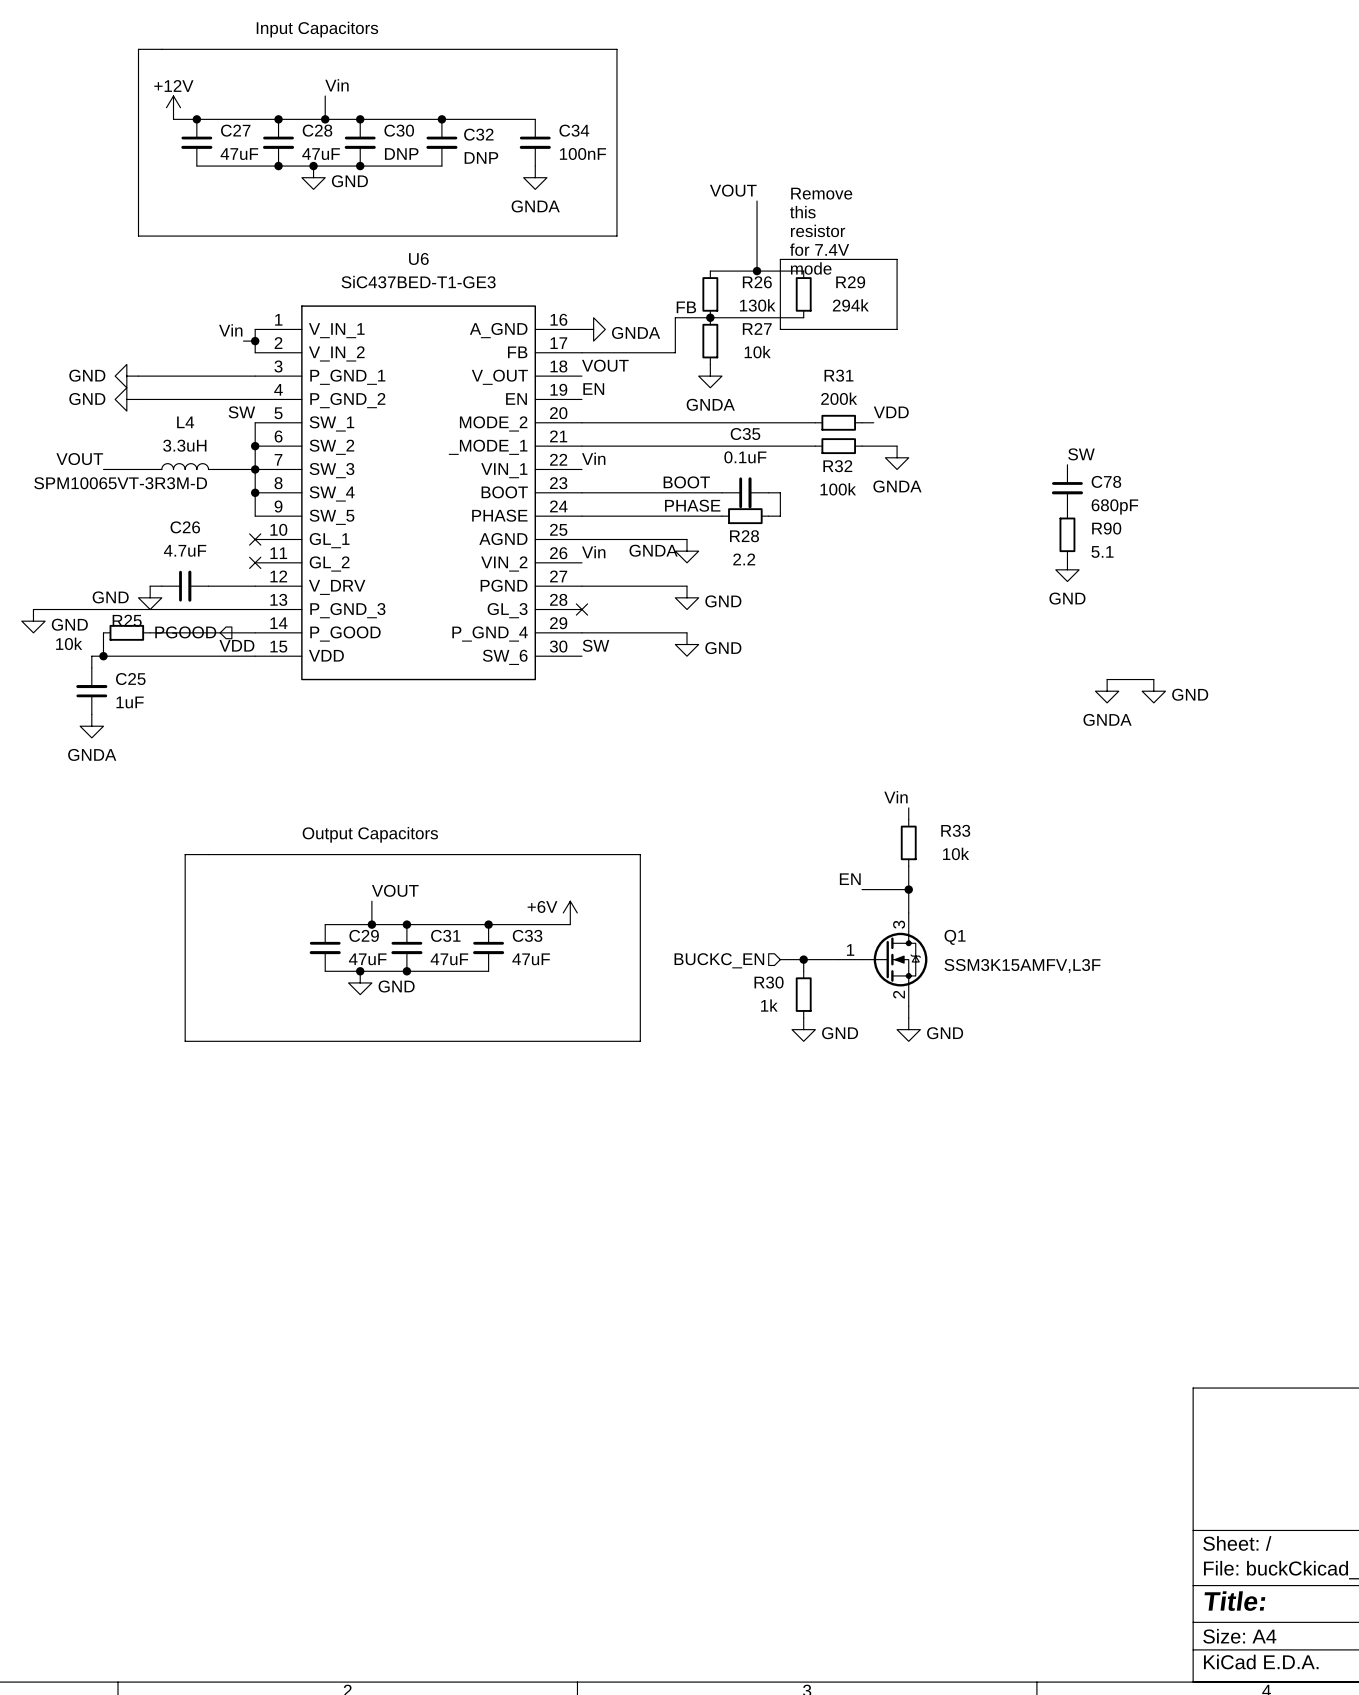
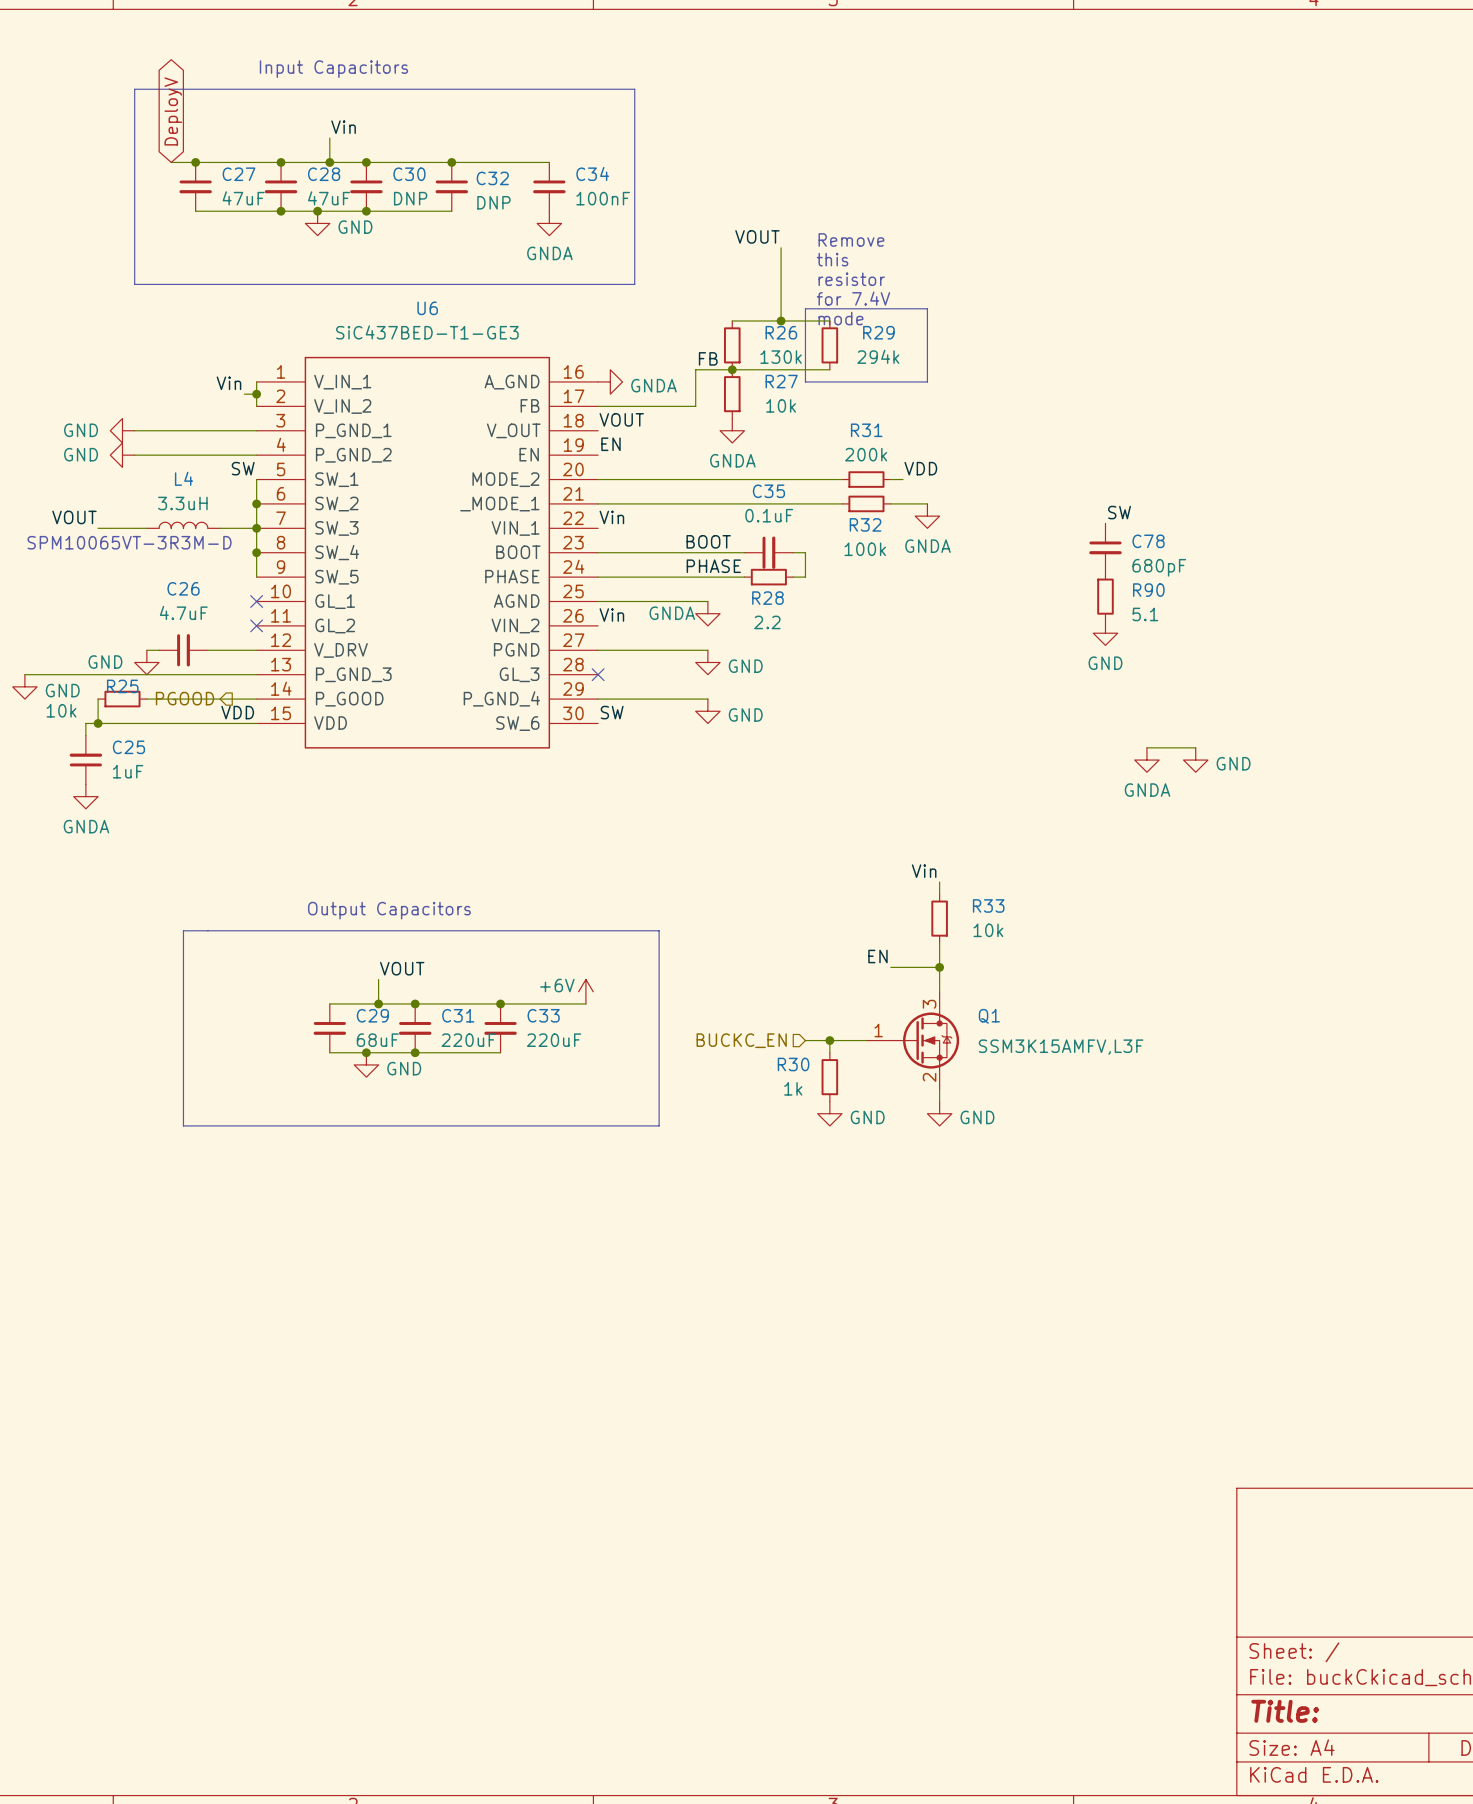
global label: none -> DeployV (173, 111)
power symbol: +12V (173, 107) -> none
C29 value: 47uF (367, 959) -> 68uF (377, 1040)
C31 value: 47uF (449, 959) -> 220uF (468, 1040)
C33 value: 47uF (531, 959) -> 220uF (554, 1040)

